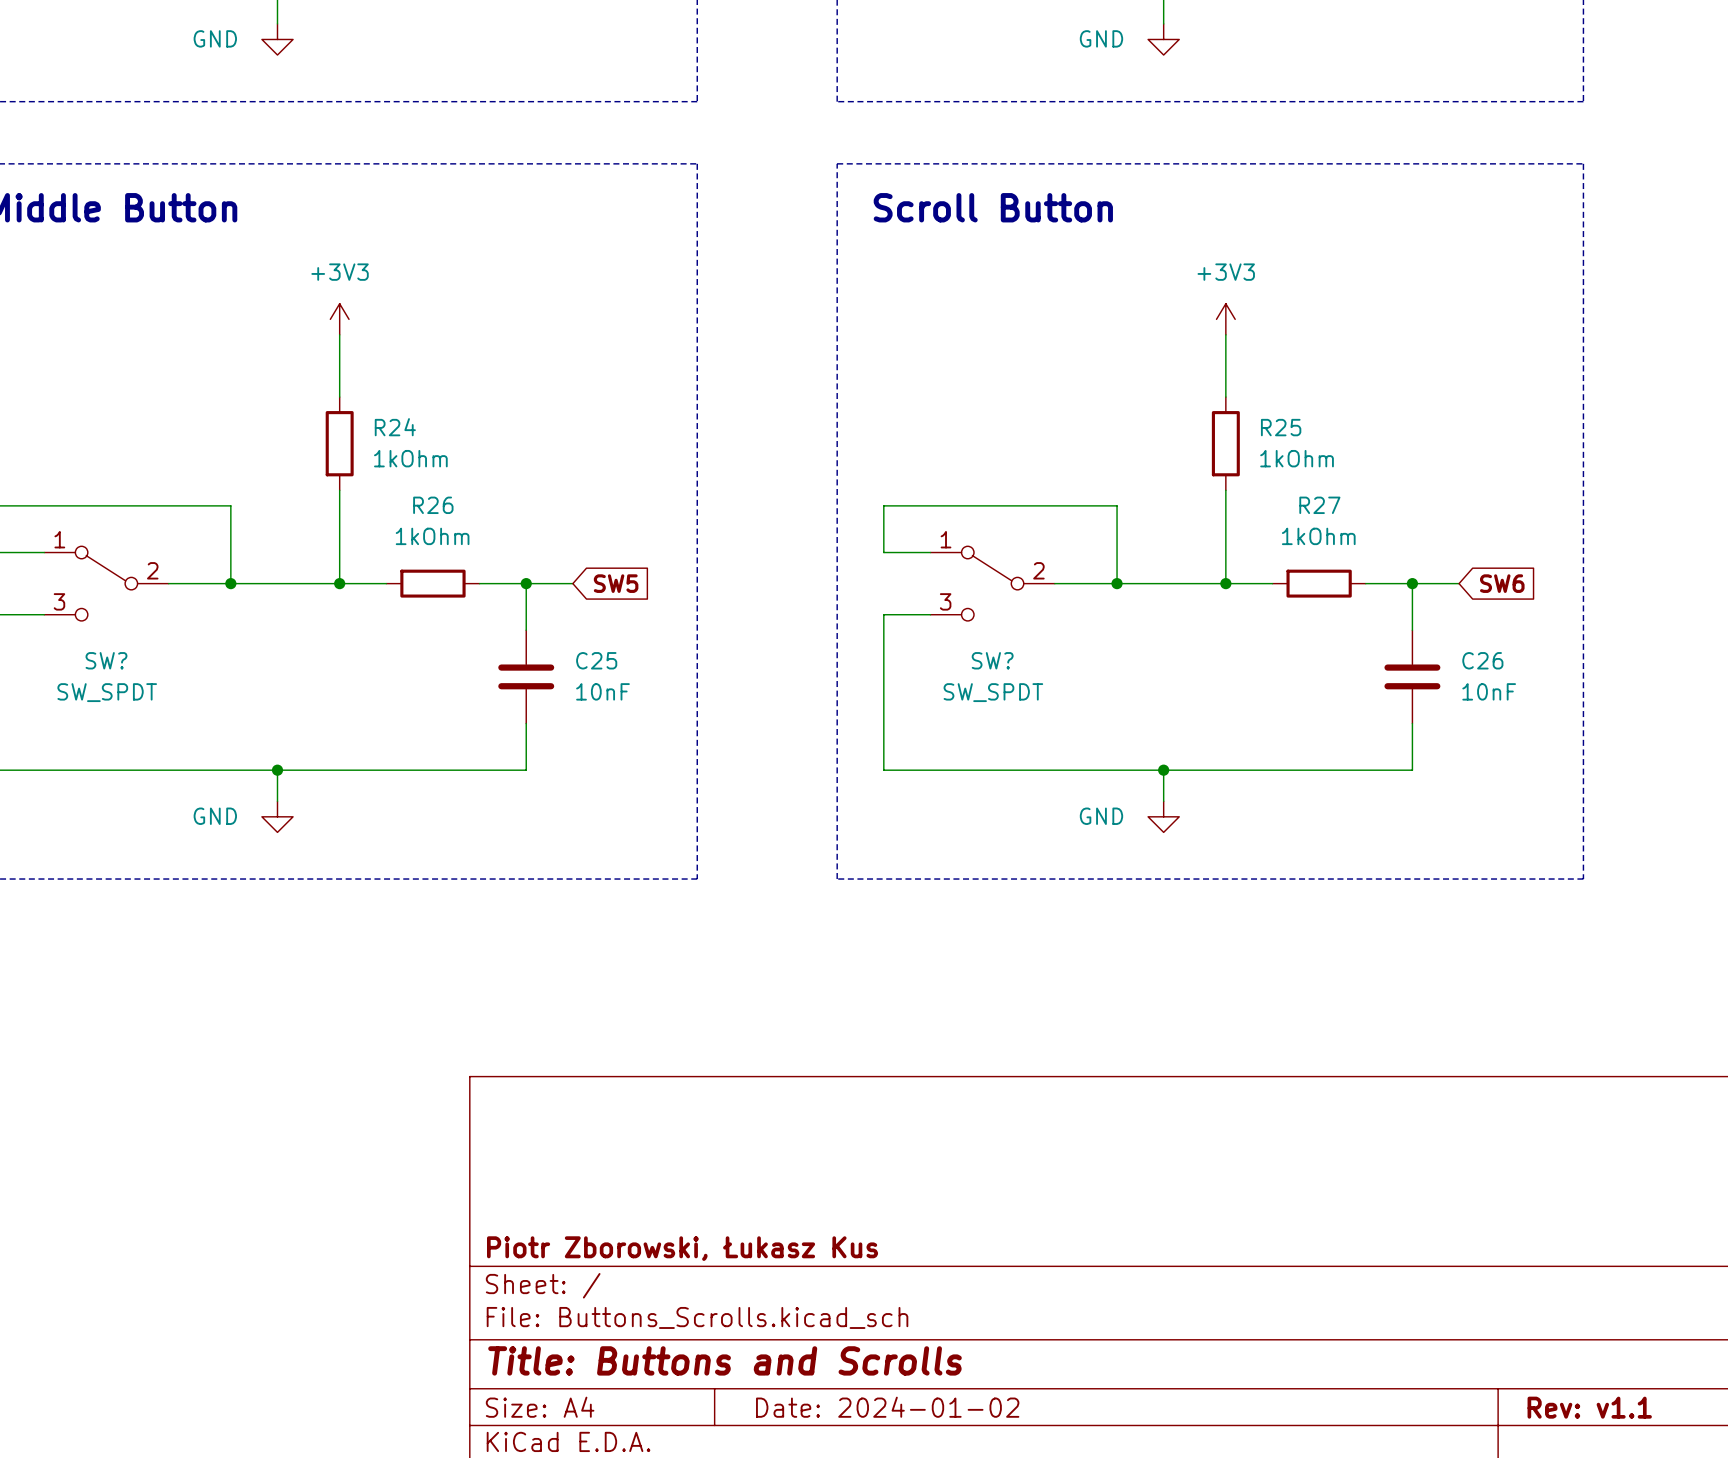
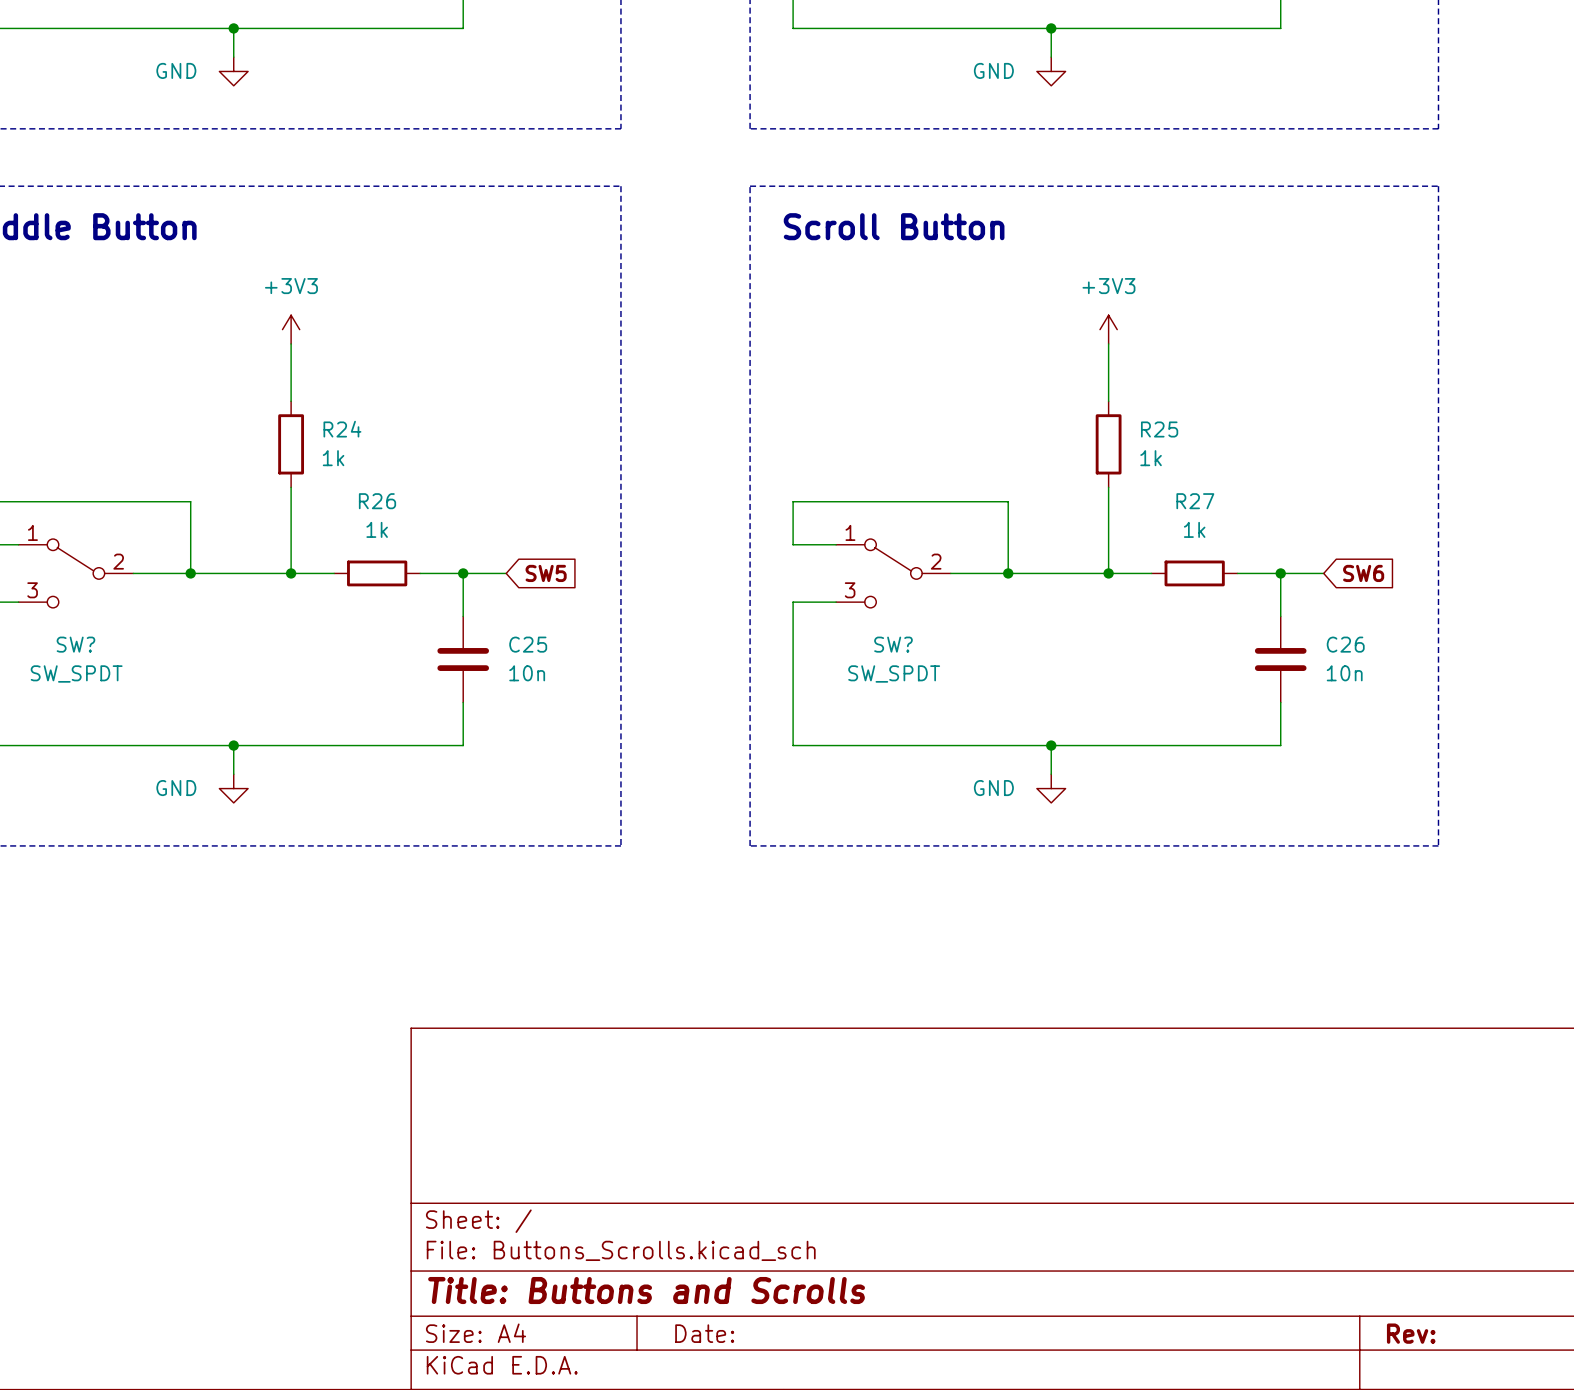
R24 value: 1kOhm (410, 458) -> 1k (333, 458)
R25 value: 1kOhm (1297, 458) -> 1k (1151, 458)
R26 value: 1kOhm (432, 536) -> 1k (377, 529)
R27 value: 1kOhm (1318, 536) -> 1k (1194, 529)
C25 value: 10nF (602, 691) -> 10n (527, 673)
C26 value: 10nF (1489, 691) -> 10n (1344, 673)
title block: Piotr Zborowski, Łukasz Kus (682, 1248) -> none
title block: Date: 2024-01-02 (887, 1407) -> Date: (704, 1333)
title block: Rev: v1.1 (1589, 1407) -> Rev: (1411, 1333)

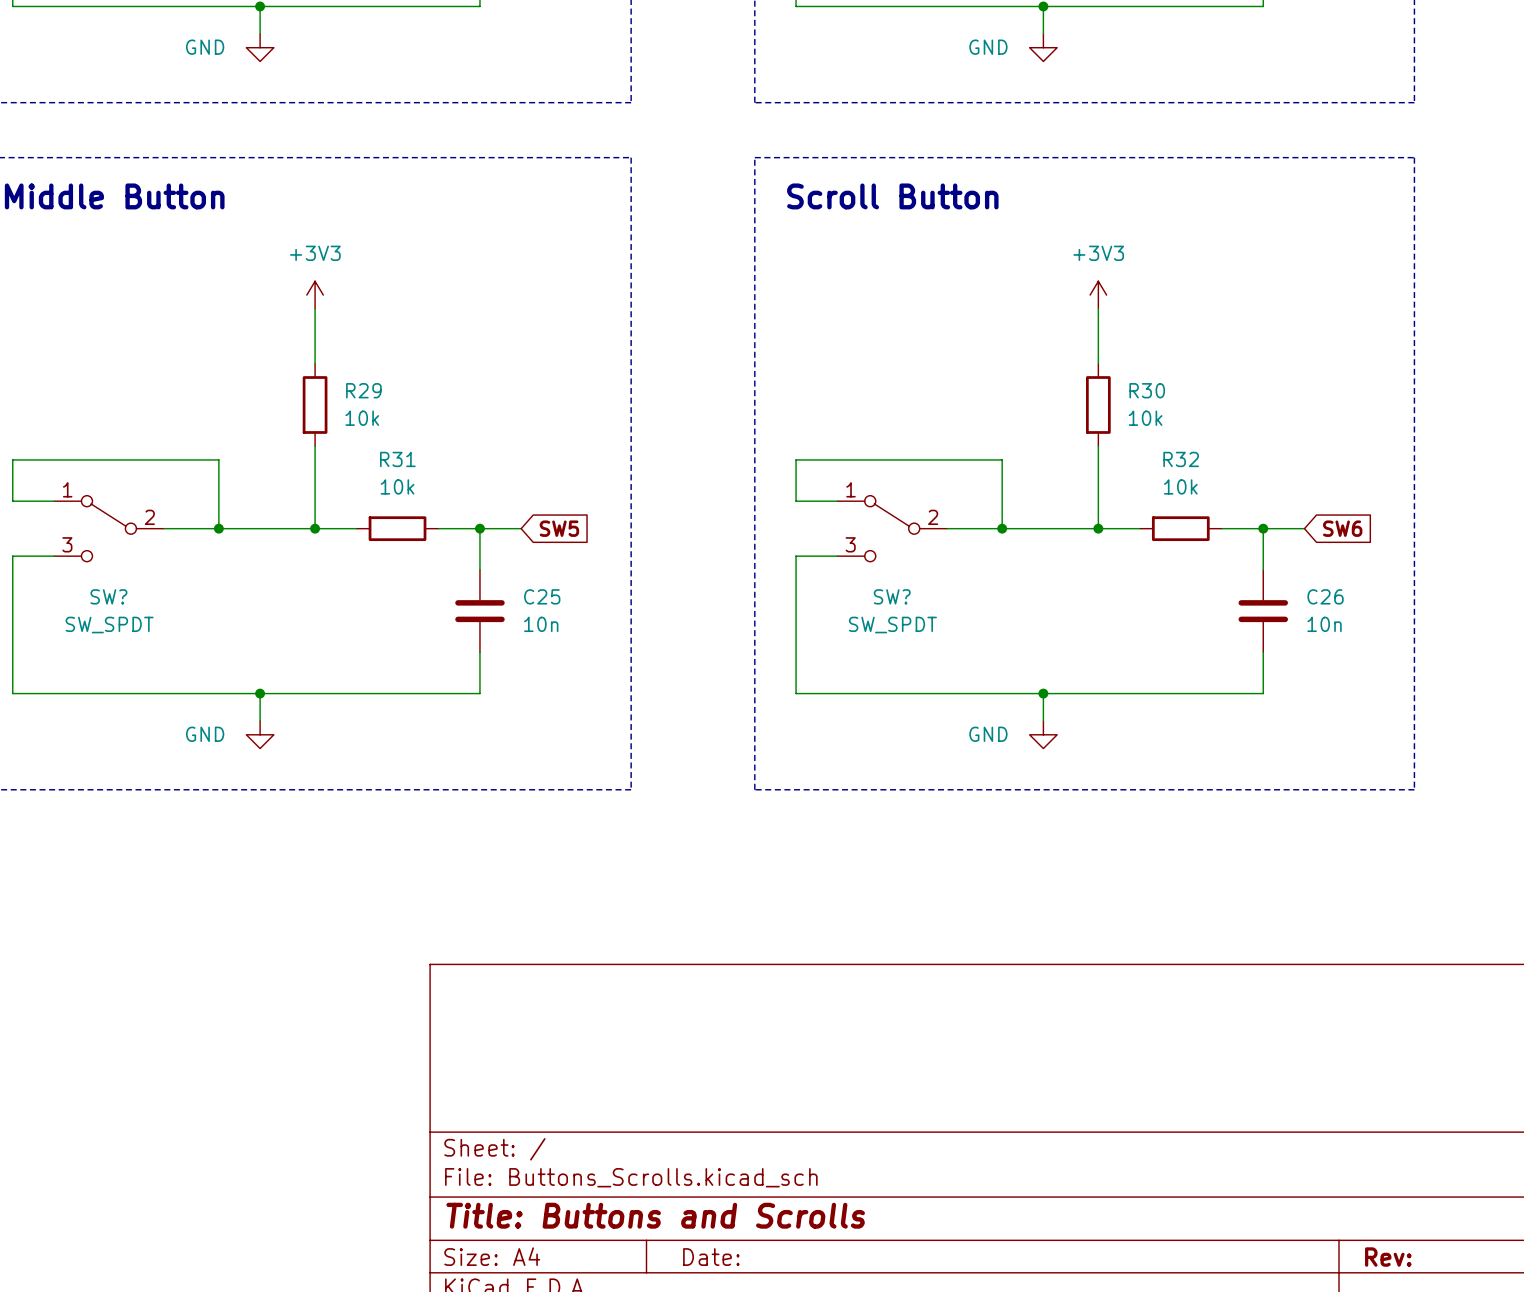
R24 name: R24 (342, 429) -> R29 (363, 390)
R25 name: R25 (1159, 429) -> R30 (1147, 390)
R24 value: 1k (333, 458) -> 10k (362, 418)
R25 value: 1k (1151, 458) -> 10k (1145, 418)
R26 name: R26 (377, 501) -> R31 (397, 459)
R27 name: R27 (1195, 501) -> R32 (1181, 459)
R26 value: 1k (377, 529) -> 10k (397, 486)
R27 value: 1k (1194, 529) -> 10k (1180, 486)

